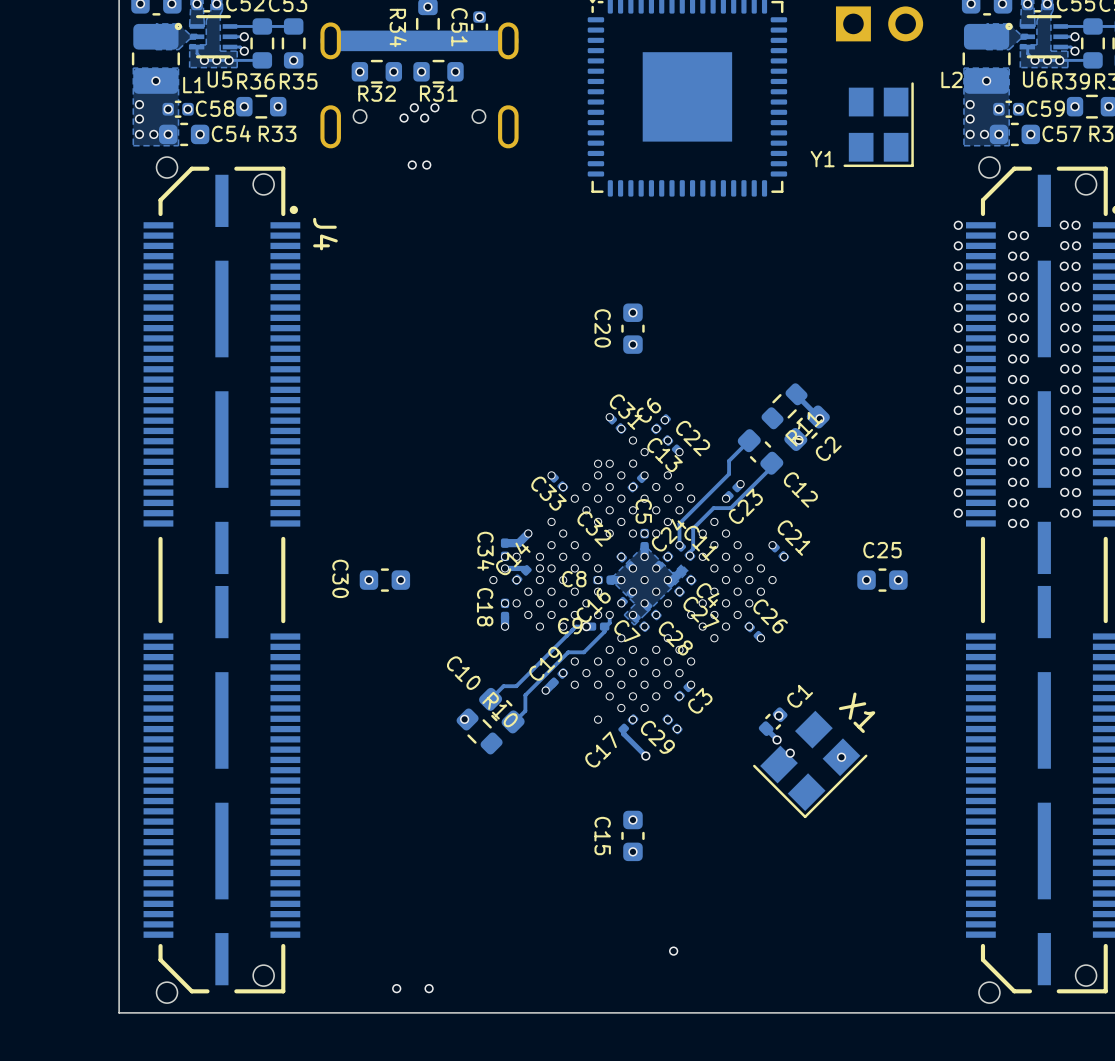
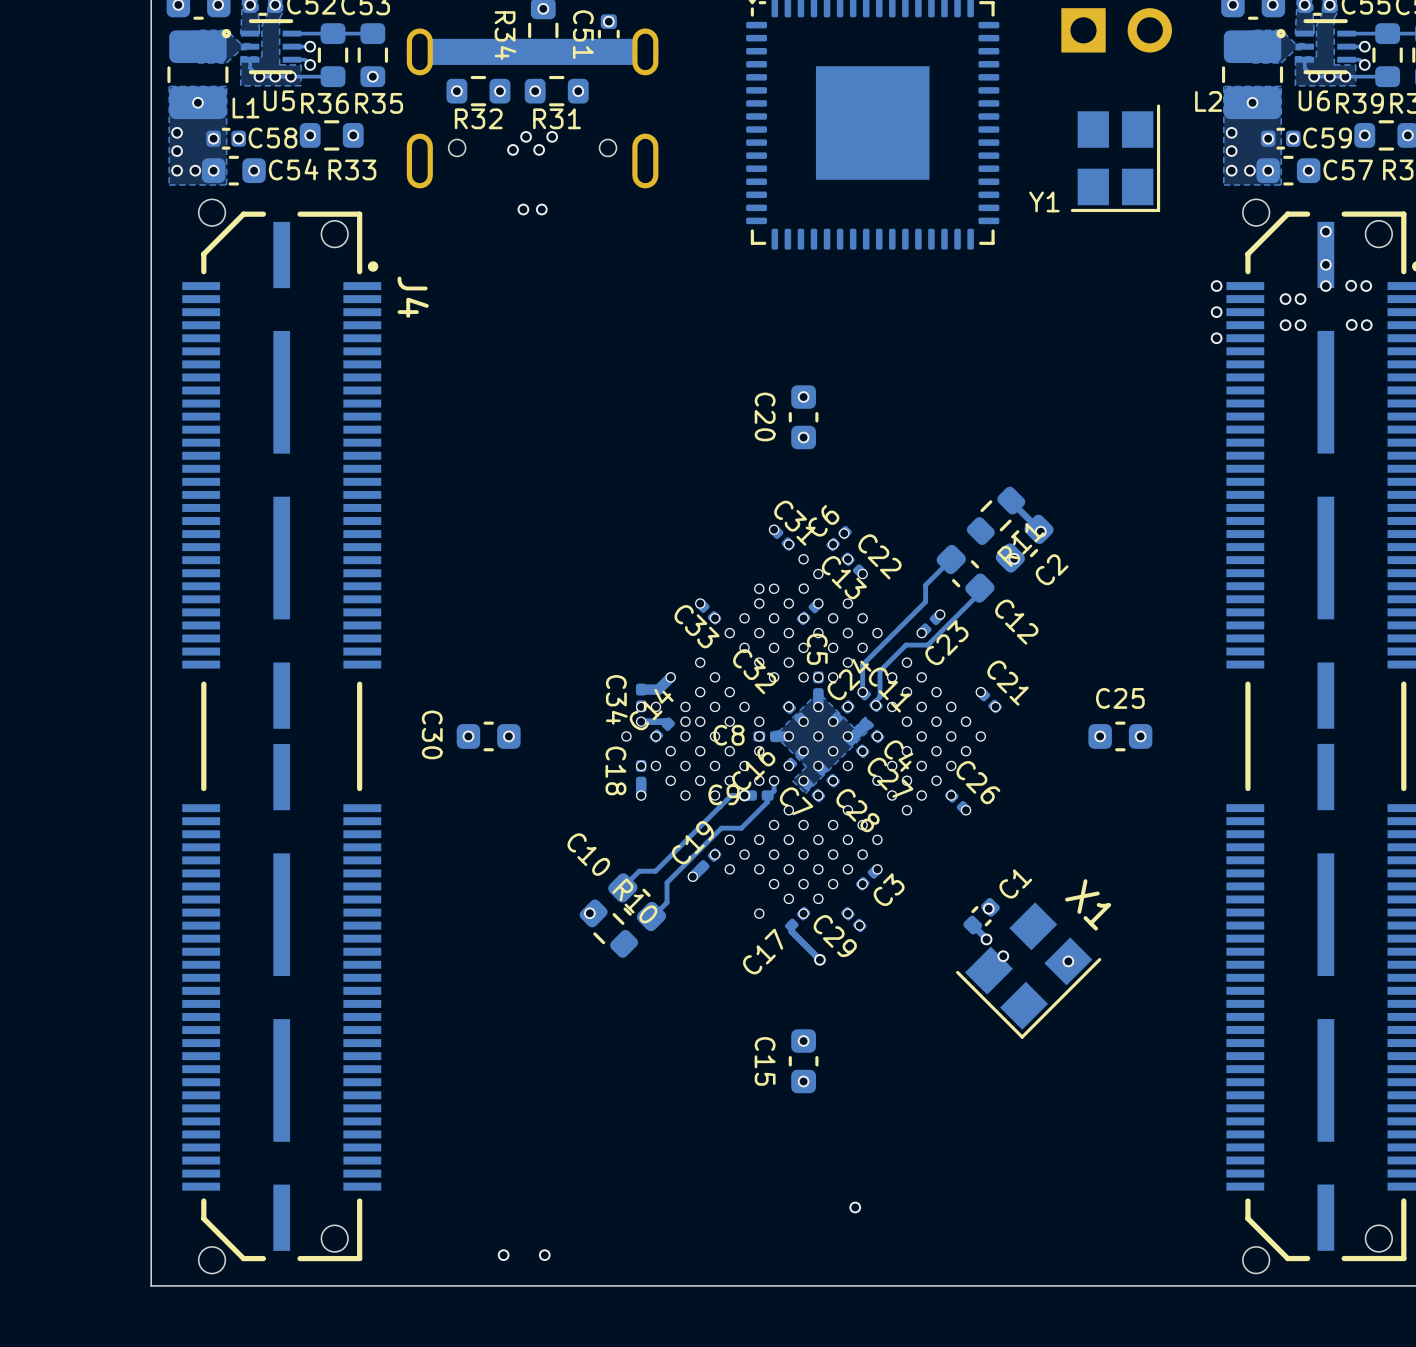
via: none -> (1325, 231)
via: none -> (1325, 264)
via: none -> (1325, 286)
via: (1064, 245) -> none
via: (1076, 245) -> none
via: none -> (1351, 324)
via: none -> (1366, 325)
via: (1064, 266) -> none
via: (1076, 266) -> none
via: (1012, 276) -> none
via: (1024, 276) -> none
via: (958, 286) -> none
via: (1064, 286) -> none
via: (1076, 286) -> none
via: (1012, 297) -> none
via: (1024, 297) -> none
via: (958, 307) -> none
via: (1064, 307) -> none
via: (1076, 307) -> none
via: (1012, 317) -> none
via: (1024, 317) -> none
via: (1064, 327) -> none
via: (958, 328) -> none
via: (1076, 328) -> none
via: (1012, 338) -> none
via: (1024, 338) -> none
via: (958, 348) -> none
via: (1064, 348) -> none
via: (1076, 348) -> none
via: (1012, 358) -> none
via: (1024, 358) -> none
via: (958, 369) -> none
via: (1064, 369) -> none
via: (1076, 369) -> none
via: (1012, 379) -> none
via: (1024, 379) -> none
via: (958, 389) -> none
via: (1064, 389) -> none
via: (1076, 389) -> none
via: (1012, 400) -> none
via: (1024, 400) -> none
via: (958, 410) -> none
via: (1064, 410) -> none
via: (1076, 410) -> none
via: (1012, 420) -> none
via: (1024, 420) -> none
via: (958, 430) -> none
via: (1064, 430) -> none
via: (1076, 430) -> none
via: (1012, 441) -> none
via: (1024, 441) -> none
via: (958, 451) -> none
via: (1064, 451) -> none
via: (1076, 451) -> none
via: (1012, 461) -> none
via: (1024, 461) -> none
via: (1064, 471) -> none
via: (958, 472) -> none
via: (1076, 472) -> none
via: (1012, 482) -> none
via: (1024, 482) -> none
via: (958, 492) -> none
via: (1064, 492) -> none
via: (1076, 492) -> none
via: (1012, 502) -> none
via: (1024, 502) -> none
via: (958, 513) -> none
via: (1064, 513) -> none
via: (1076, 513) -> none
via: (1012, 523) -> none
via: (1024, 523) -> none

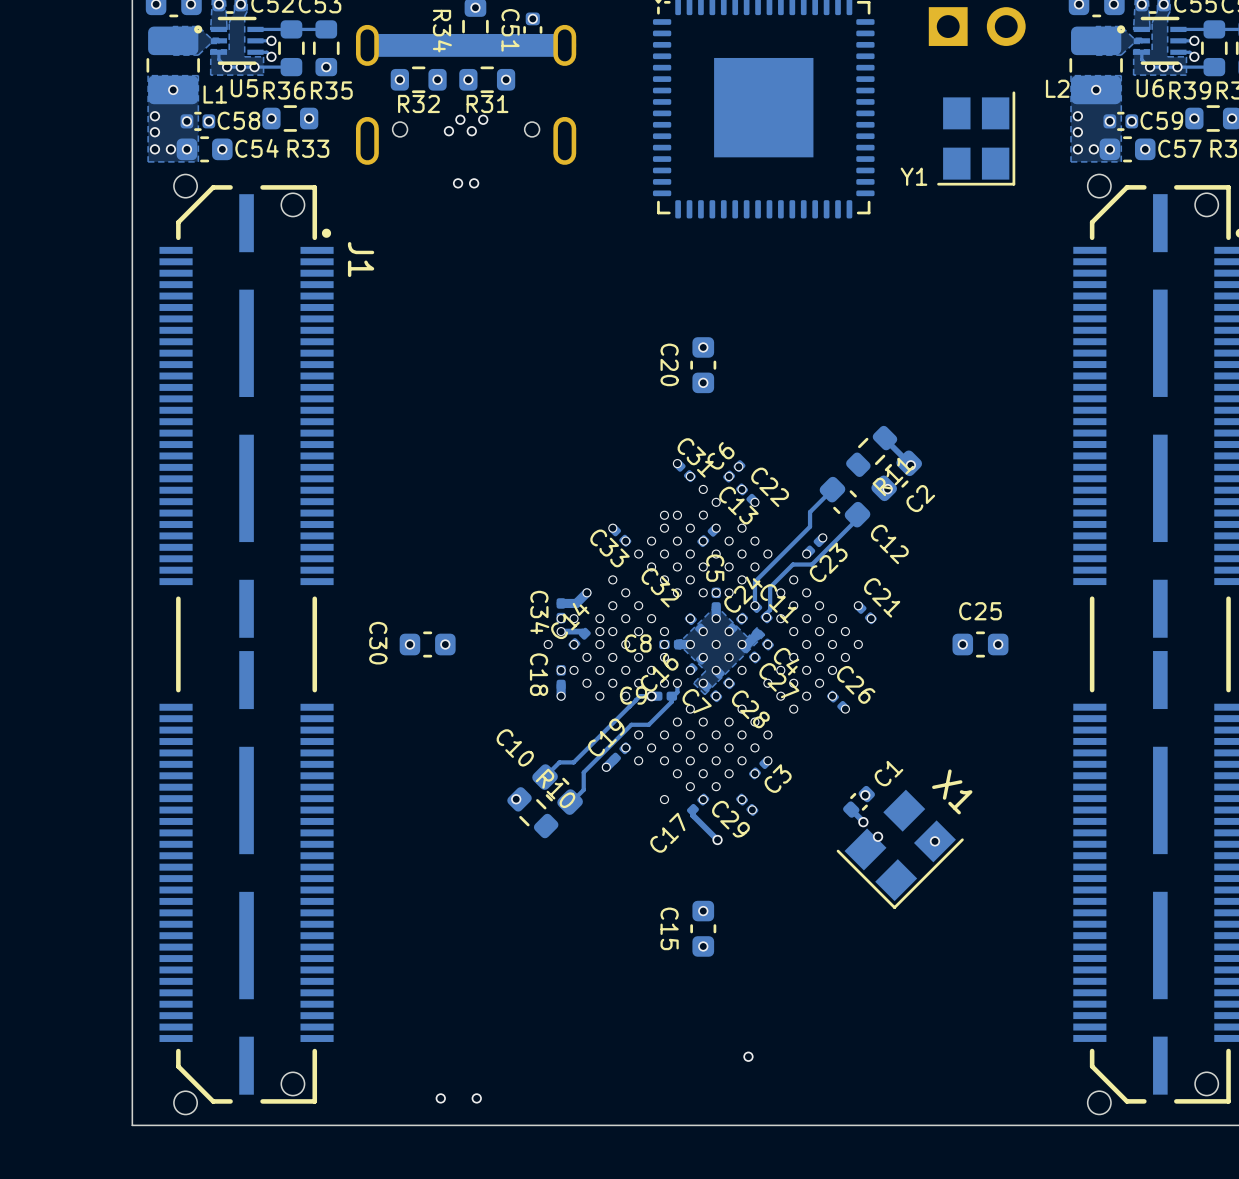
via: (1325, 231) -> none
via: (1325, 264) -> none
via: (1351, 285) -> none
via: (1216, 286) -> none
via: (1325, 286) -> none
via: (1366, 286) -> none
J4 name: J4 (413, 297) -> J1 (361, 259)
via: (1285, 299) -> none
via: (1300, 299) -> none
via: (1216, 312) -> none
via: (1351, 324) -> none
via: (1285, 325) -> none
via: (1300, 325) -> none
via: (1366, 325) -> none
via: (1216, 338) -> none

